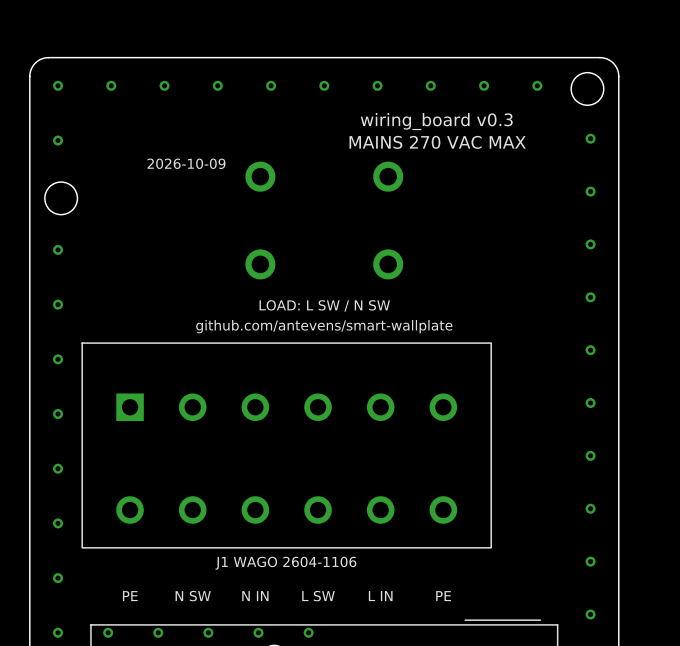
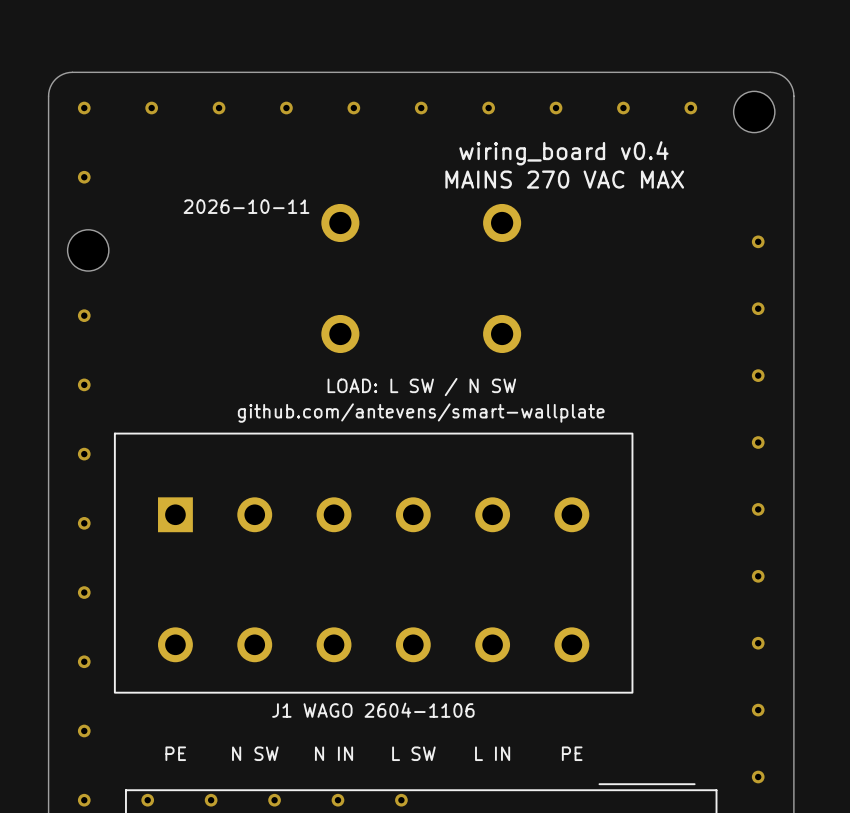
text: wiring_board v0.3 (436, 121) -> wiring_board v0.4 (563, 153)
via: (590, 138) -> none
text: 2026-10-09 (186, 163) -> 2026-10-11 (246, 206)

